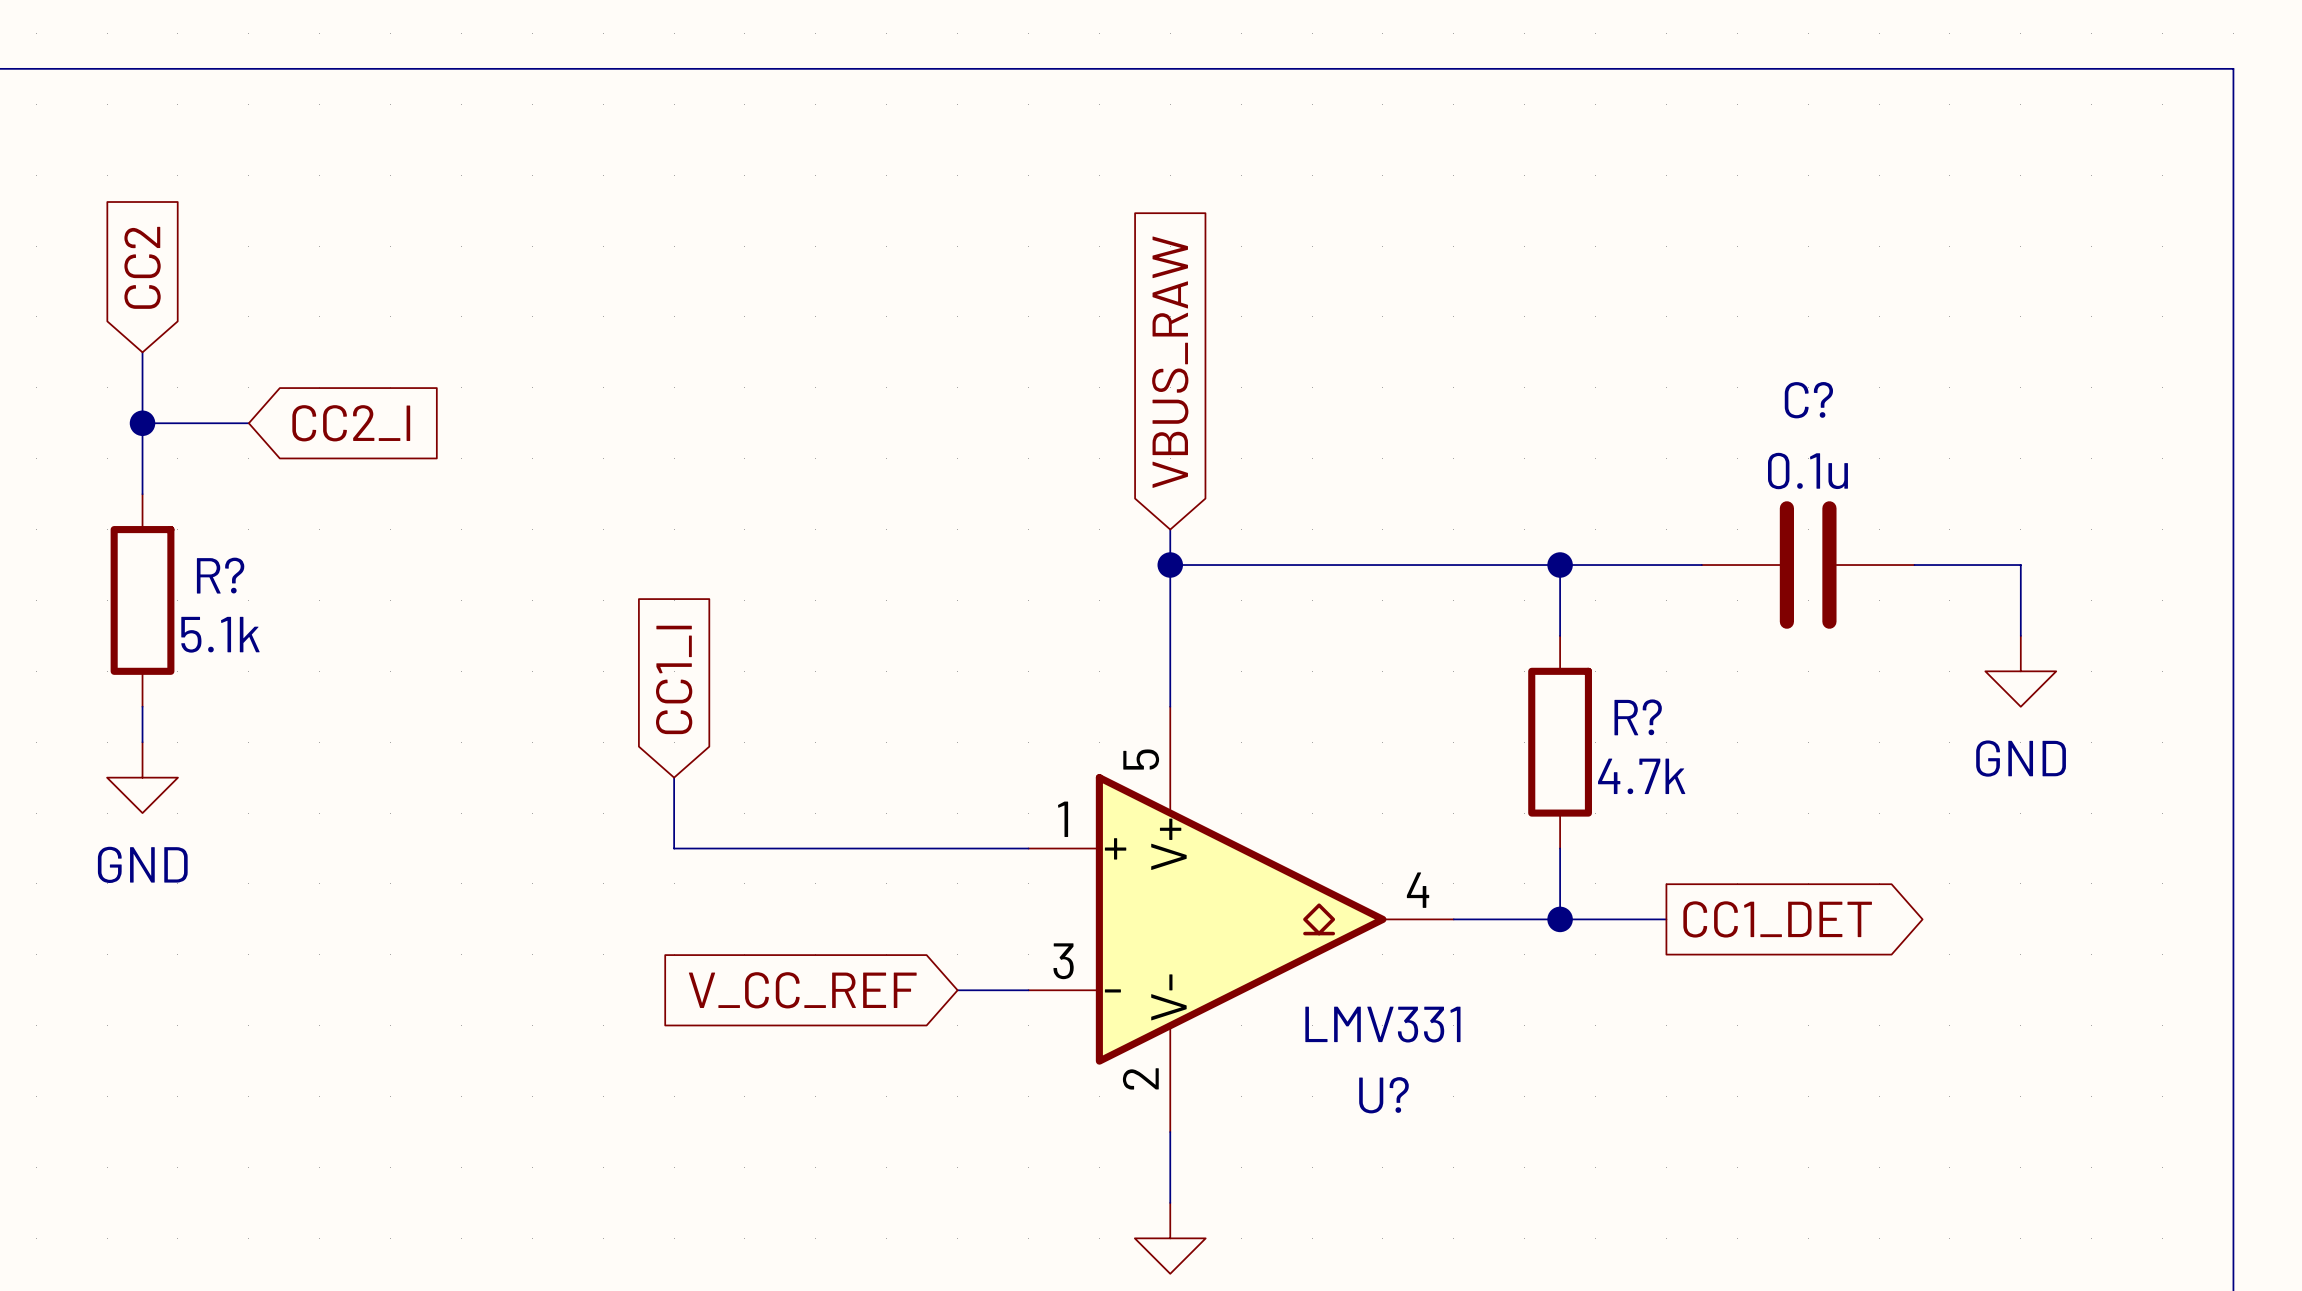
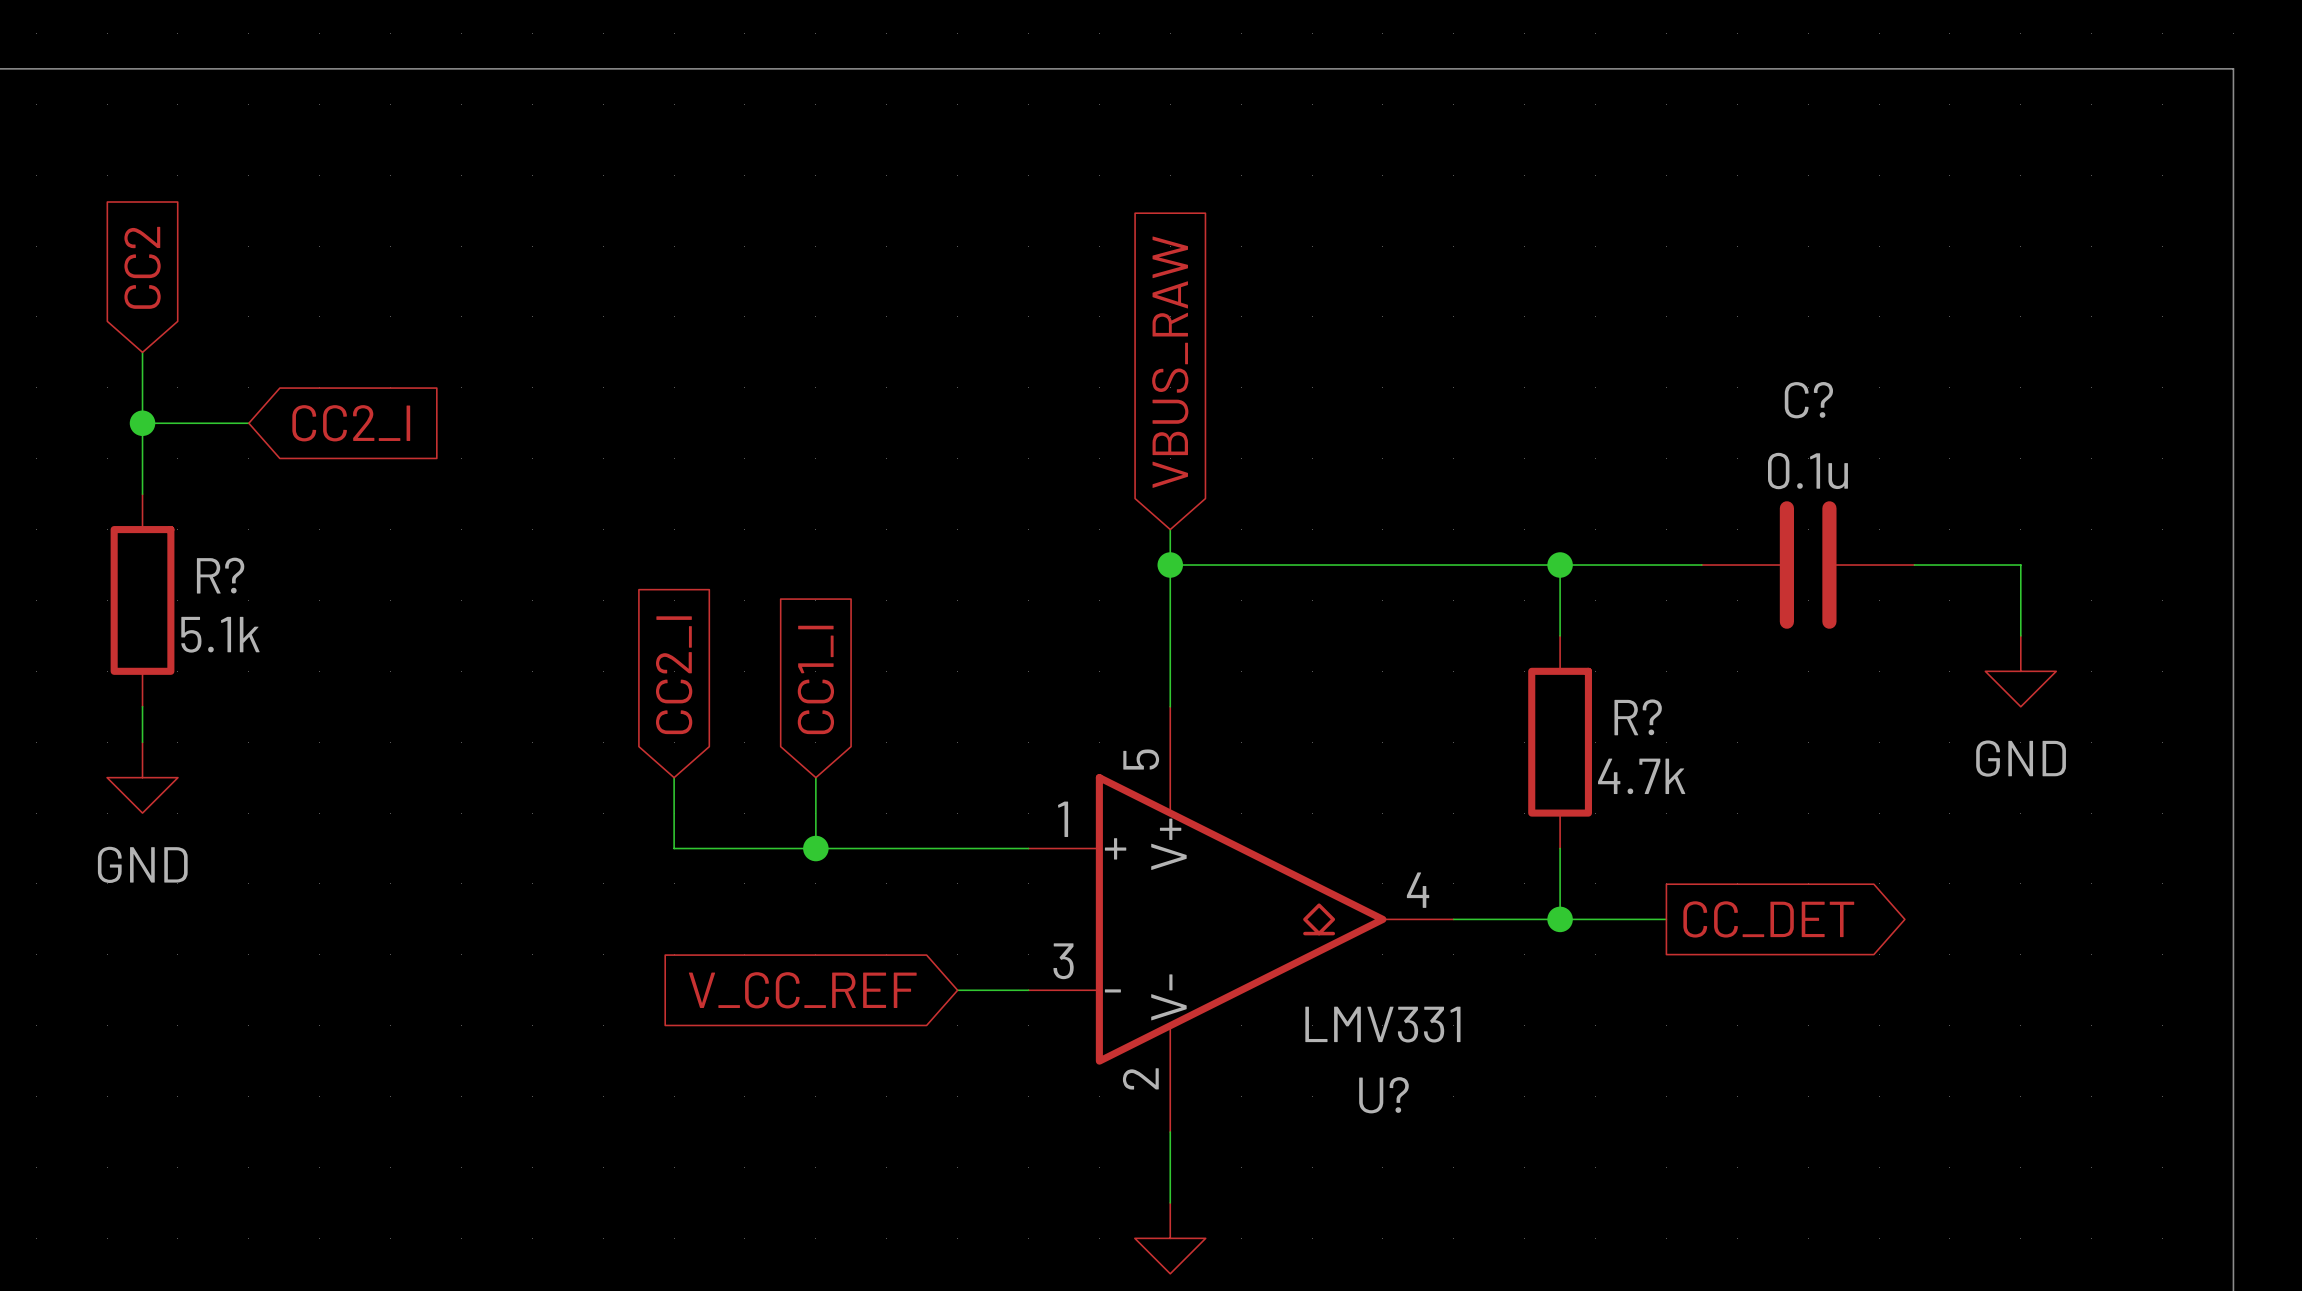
global label: CC1_I (674, 679) -> CC2_I (674, 675)
global label: none -> CC1_I (815, 679)
wire: none -> (815, 777) (815, 848)
junction: none -> (815, 848)
global label: CC1_DET (1777, 919) -> CC_DET (1768, 919)

